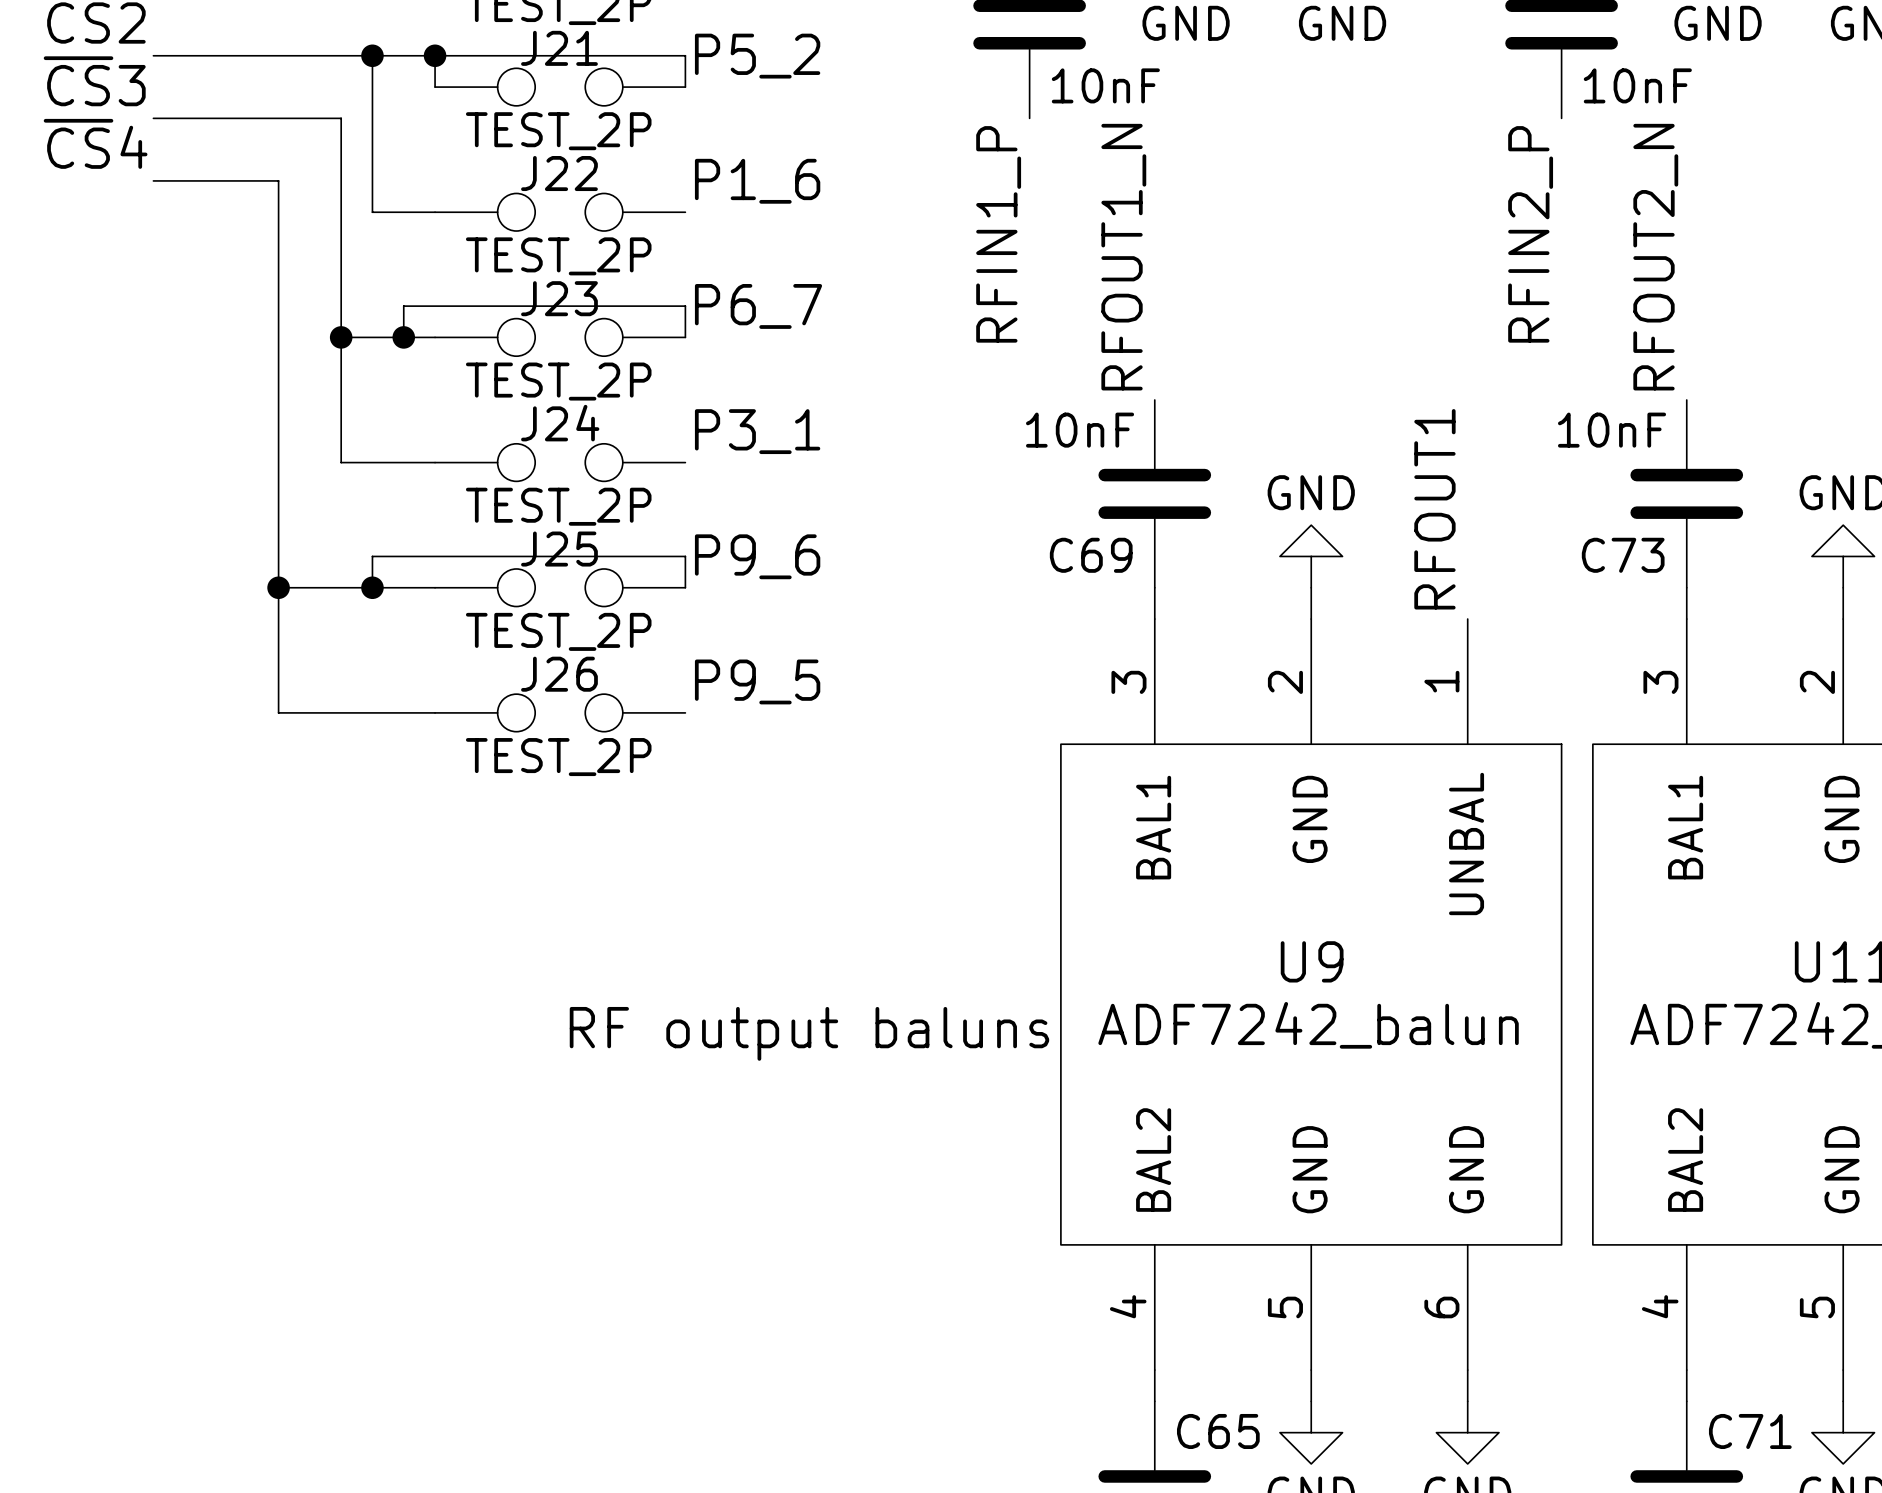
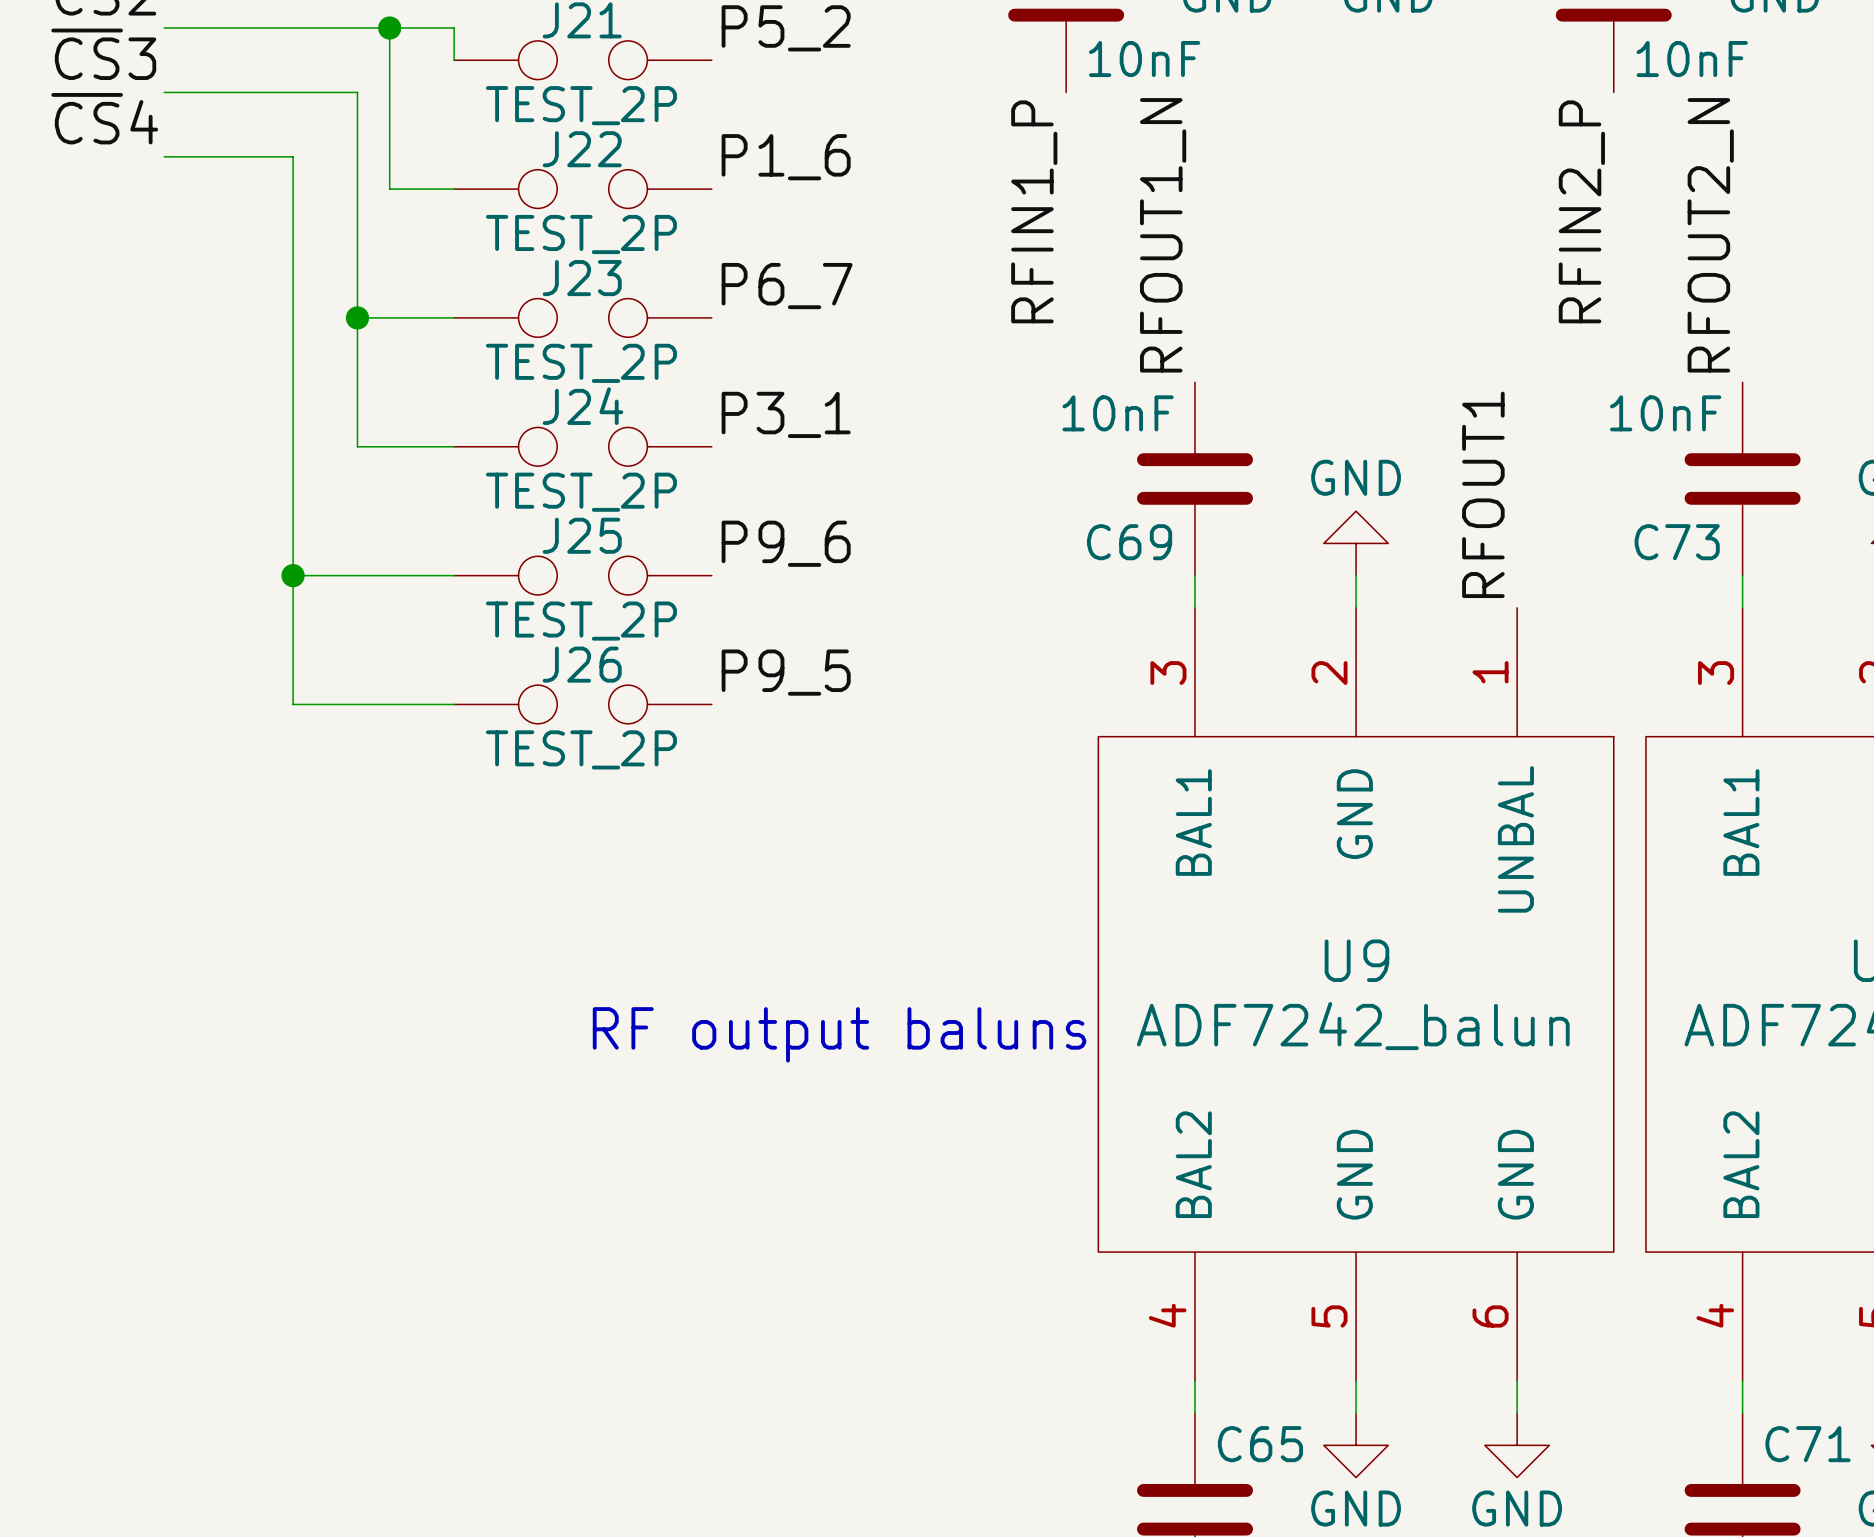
wire: (435, 55) (685, 55) (685, 87) -> none
junction: (435, 55) -> none
wire: (403, 337) (403, 306) (685, 306) (685, 337) -> none
junction: (403, 337) -> none
wire: (372, 587) (372, 556) (685, 556) (685, 587) -> none
junction: (372, 587) -> none

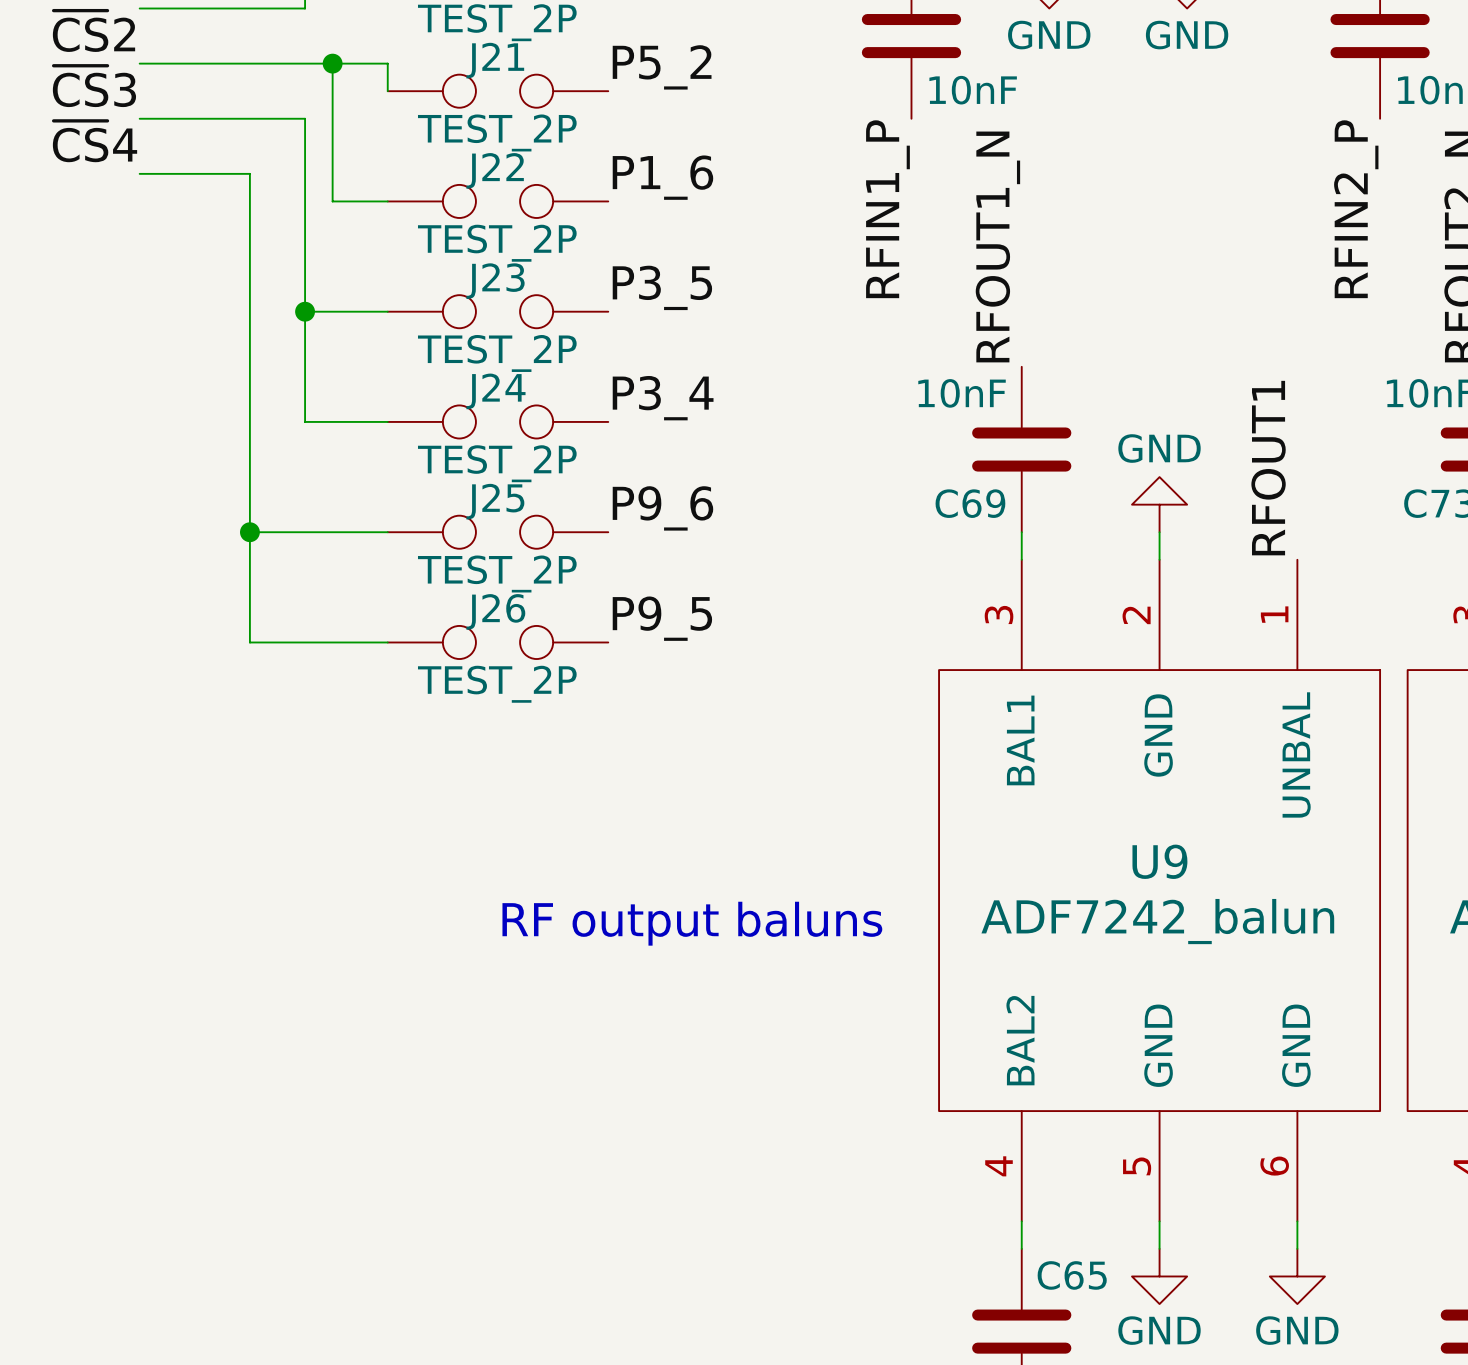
label: P6_7 (787, 286) -> P3_5 (662, 287)
label: P3_1 (786, 414) -> P3_4 (663, 398)

